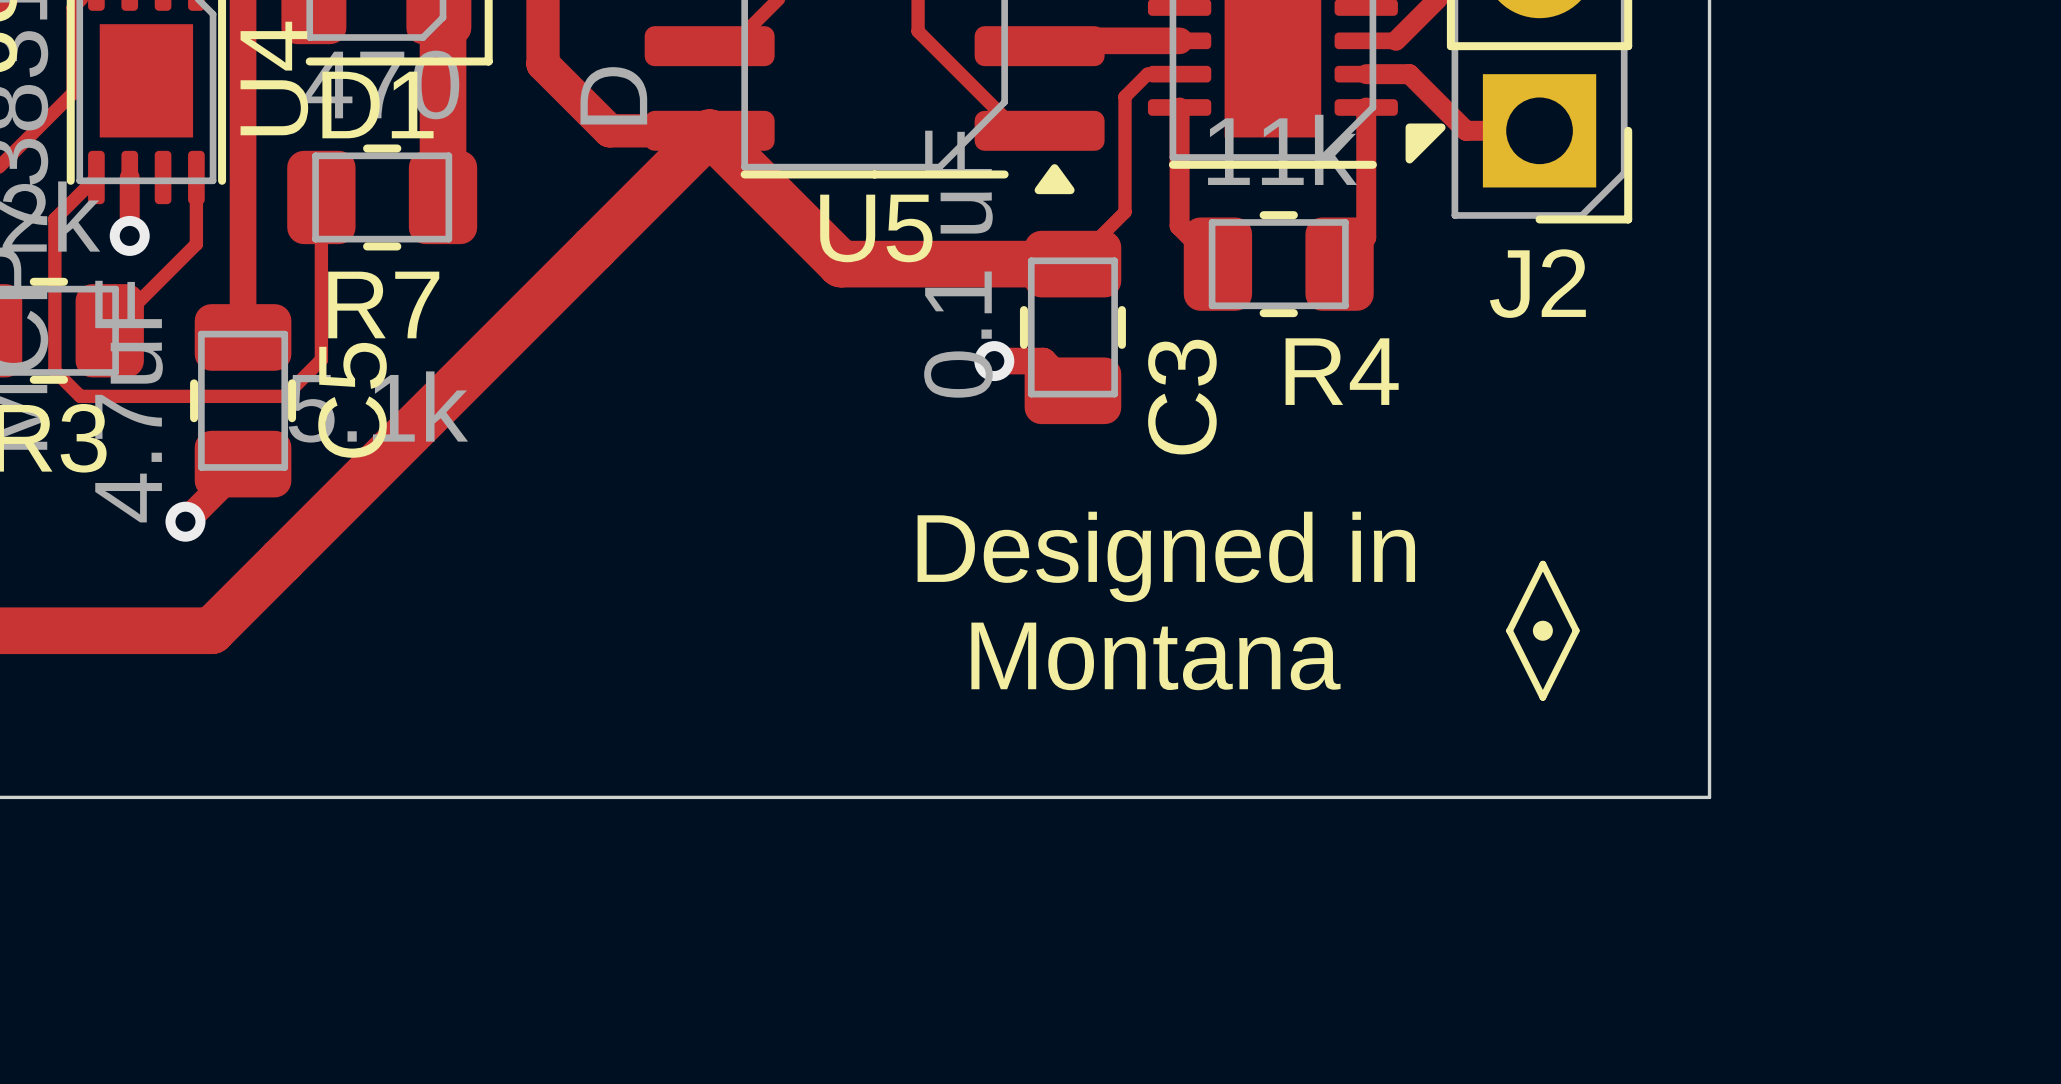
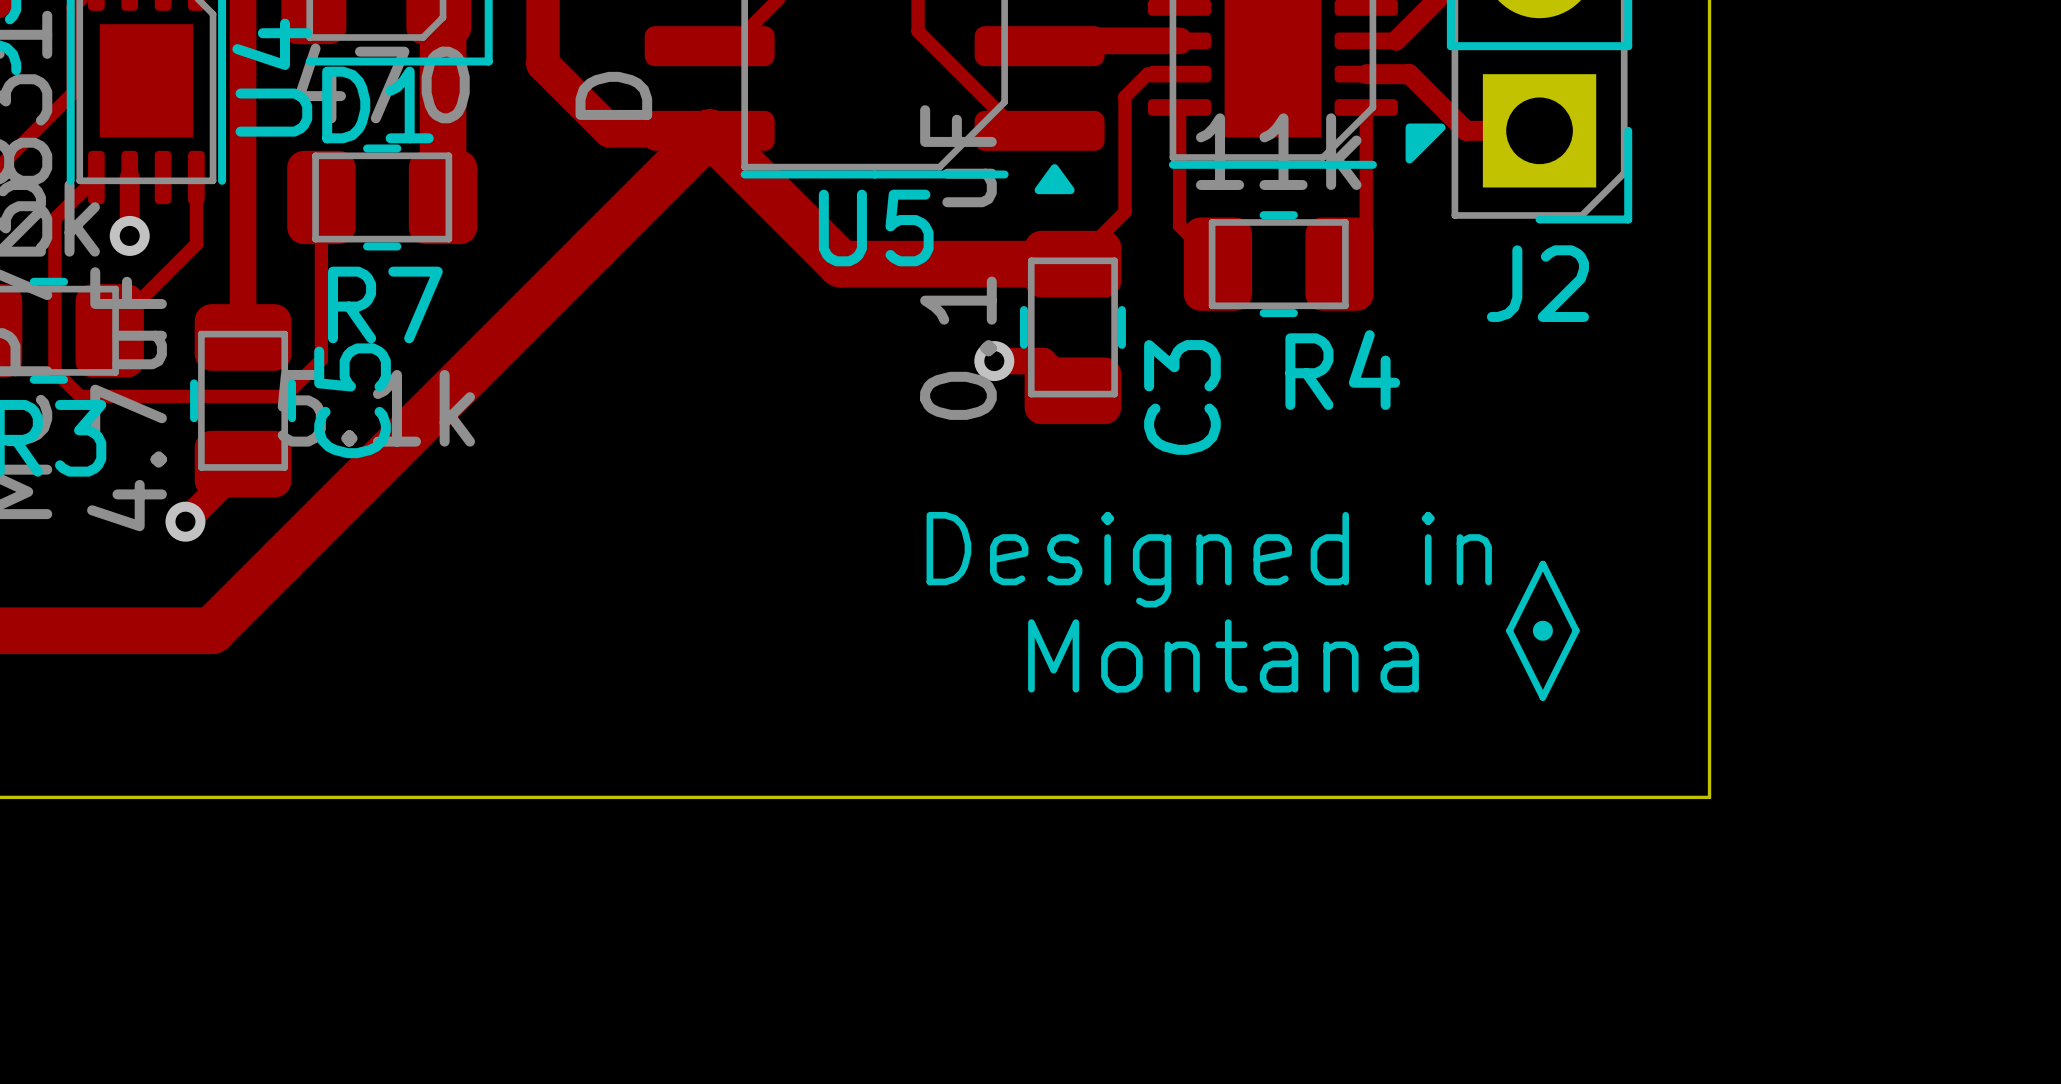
top track width: thick (1179, 107) (1179, 225) (1217, 264) -> thin (1179, 107) (1179, 225) (1217, 264)
top track width: thick (1366, 107) (1366, 237) (1339, 264) -> thin (1366, 107) (1366, 237) (1339, 264)

